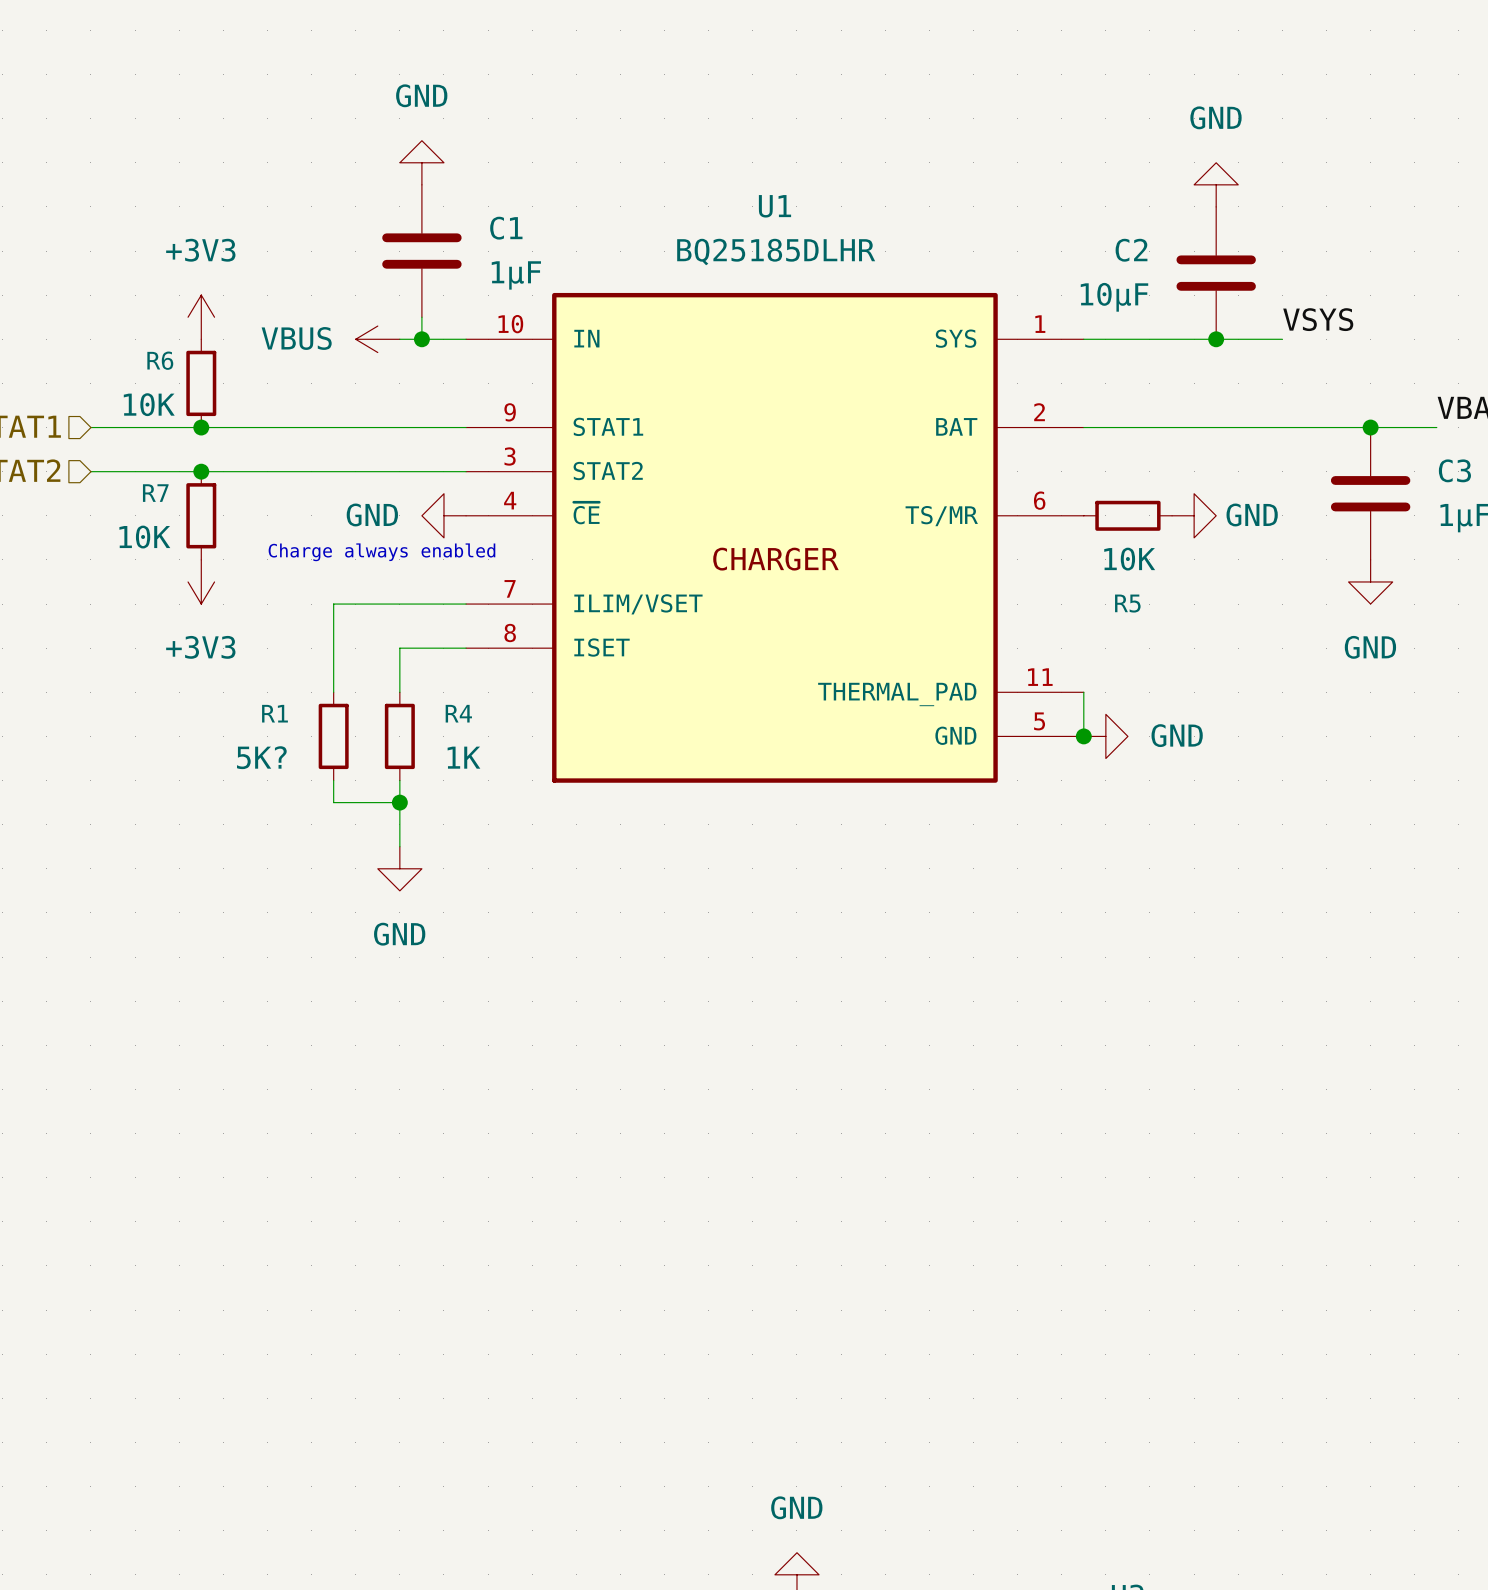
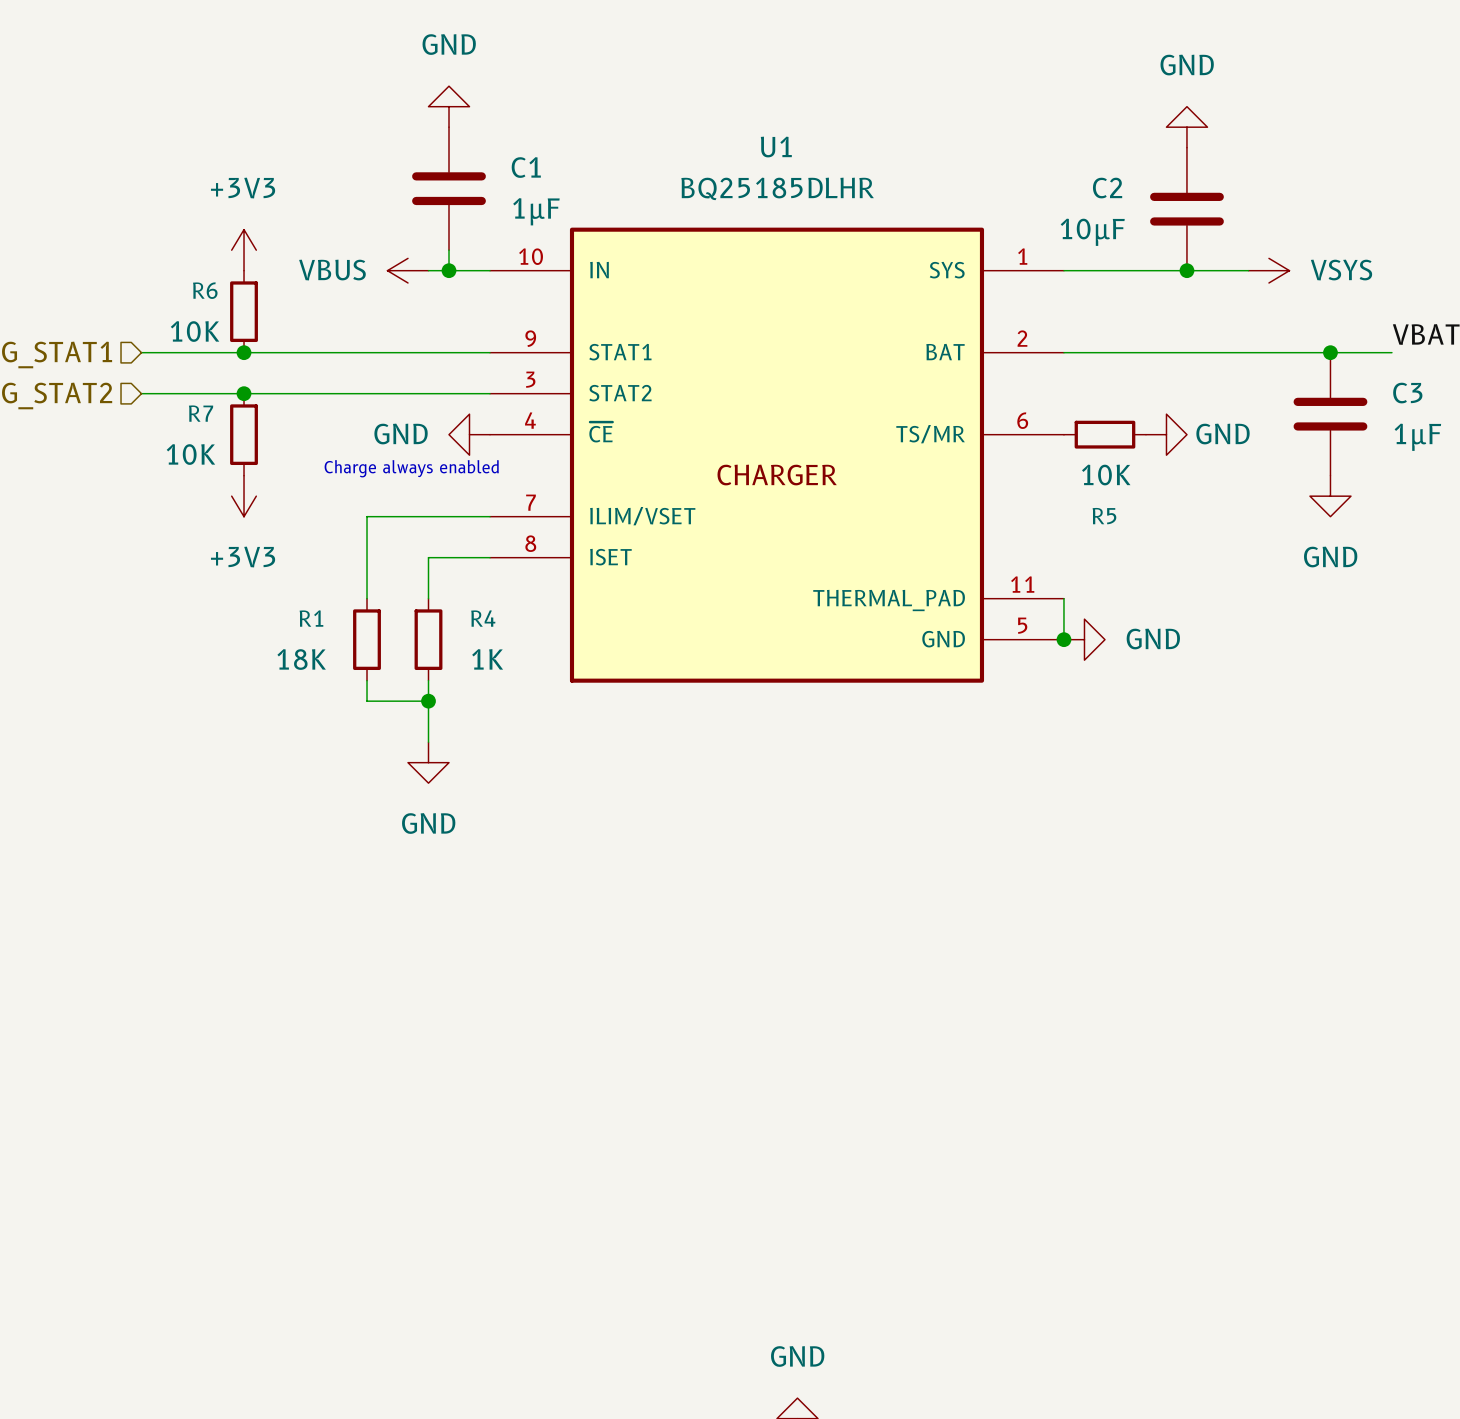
label: VSYS (1318, 319) -> none
power symbol: none -> VSYS (1268, 270)
R1 value: 5K? (261, 757) -> 18K (301, 659)

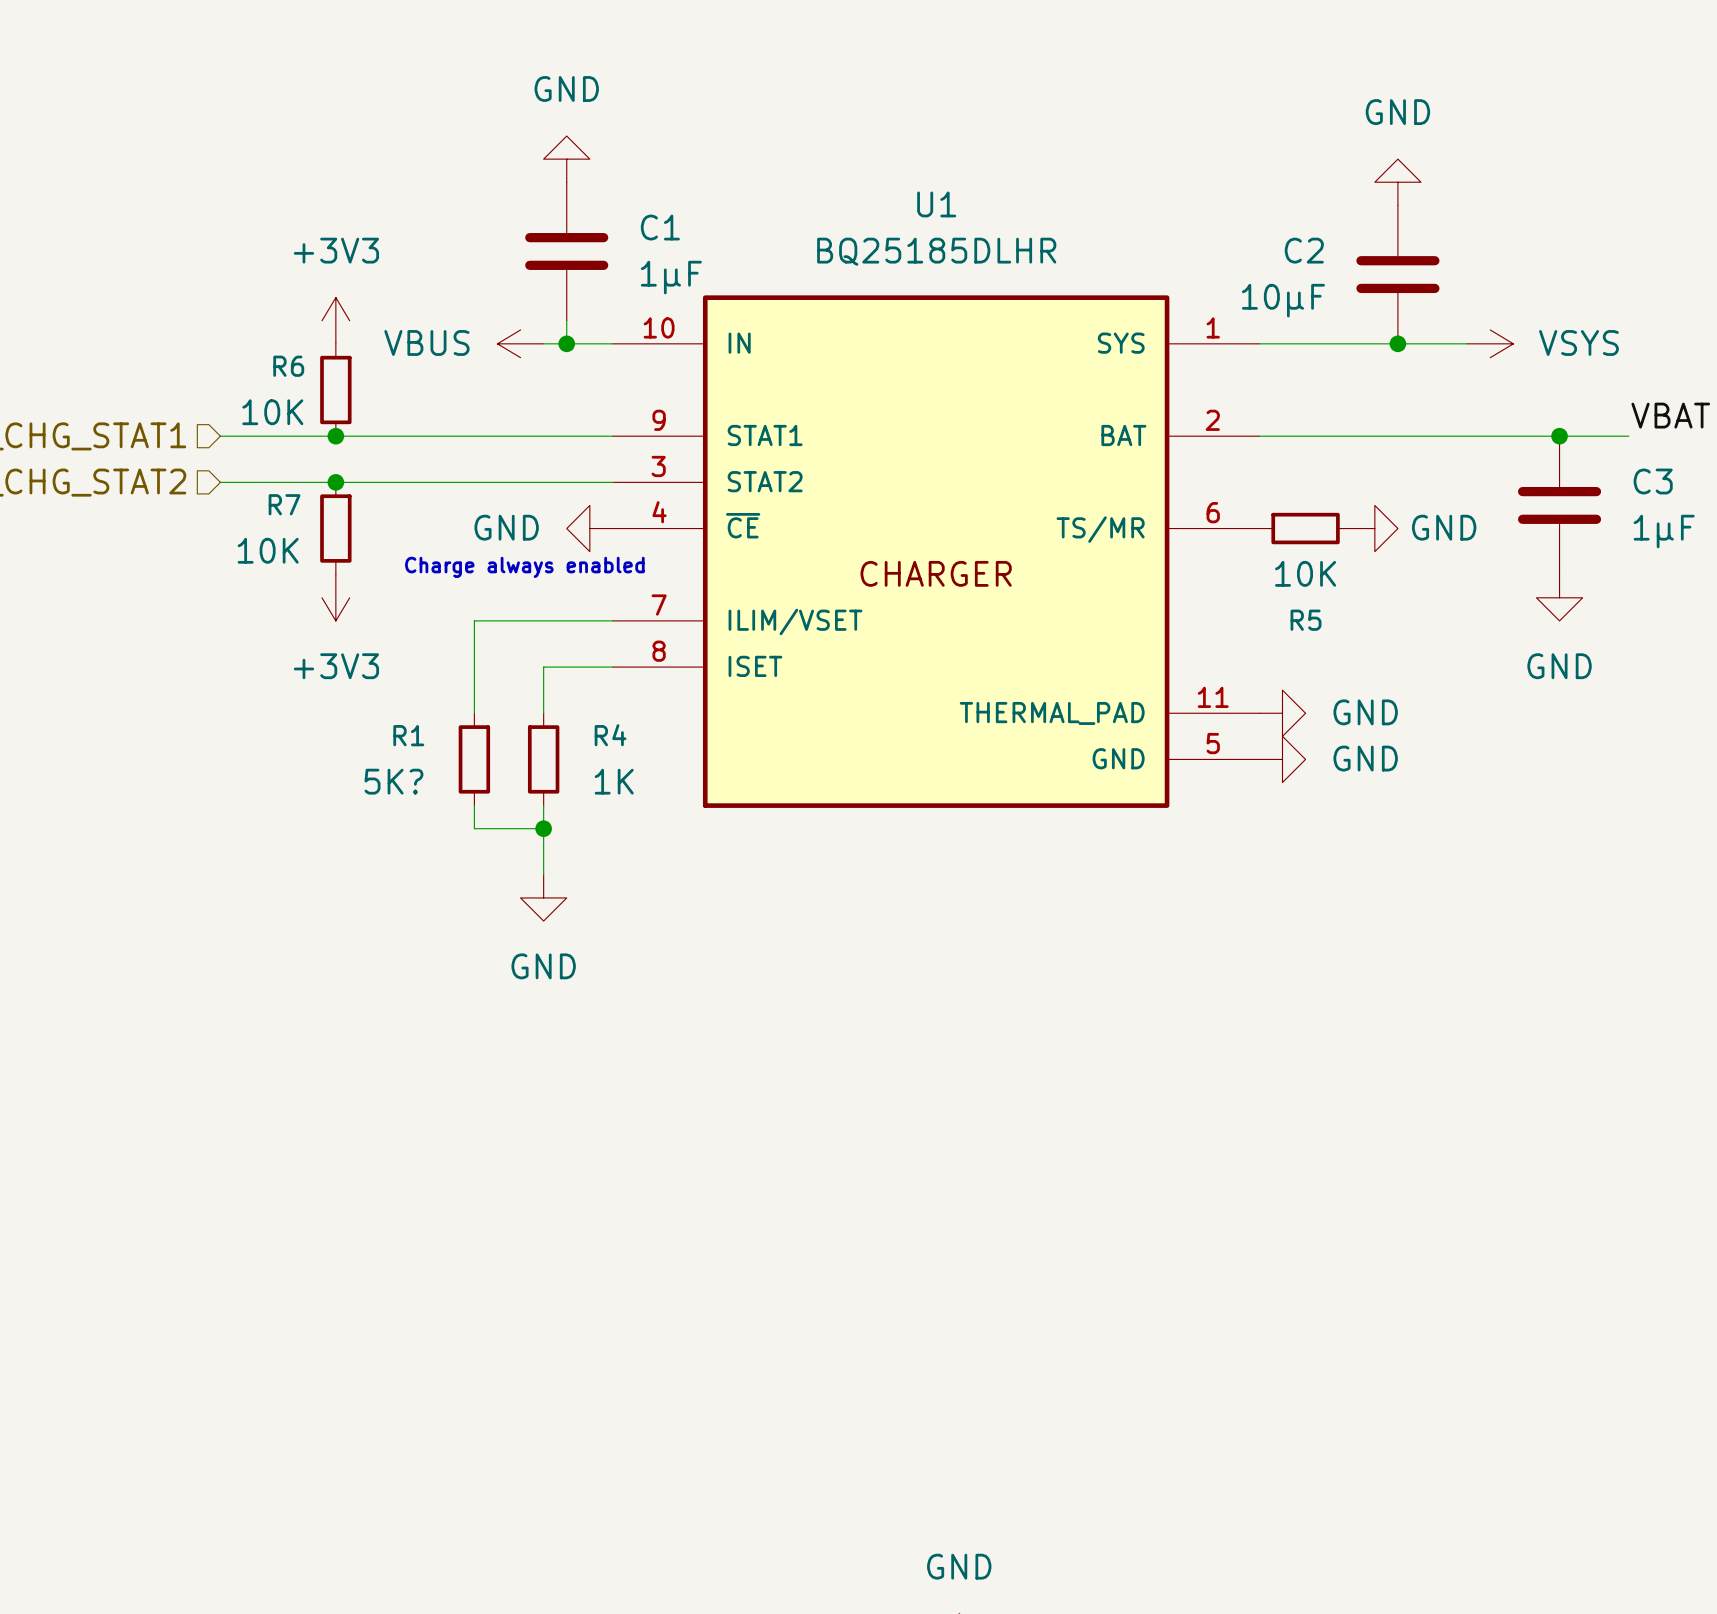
wire: (1063, 598) (1063, 639) -> none
power symbol: none -> GND (1282, 713)
junction: (1063, 639) -> none
R1 value: 18K (301, 659) -> 5K? (393, 781)

